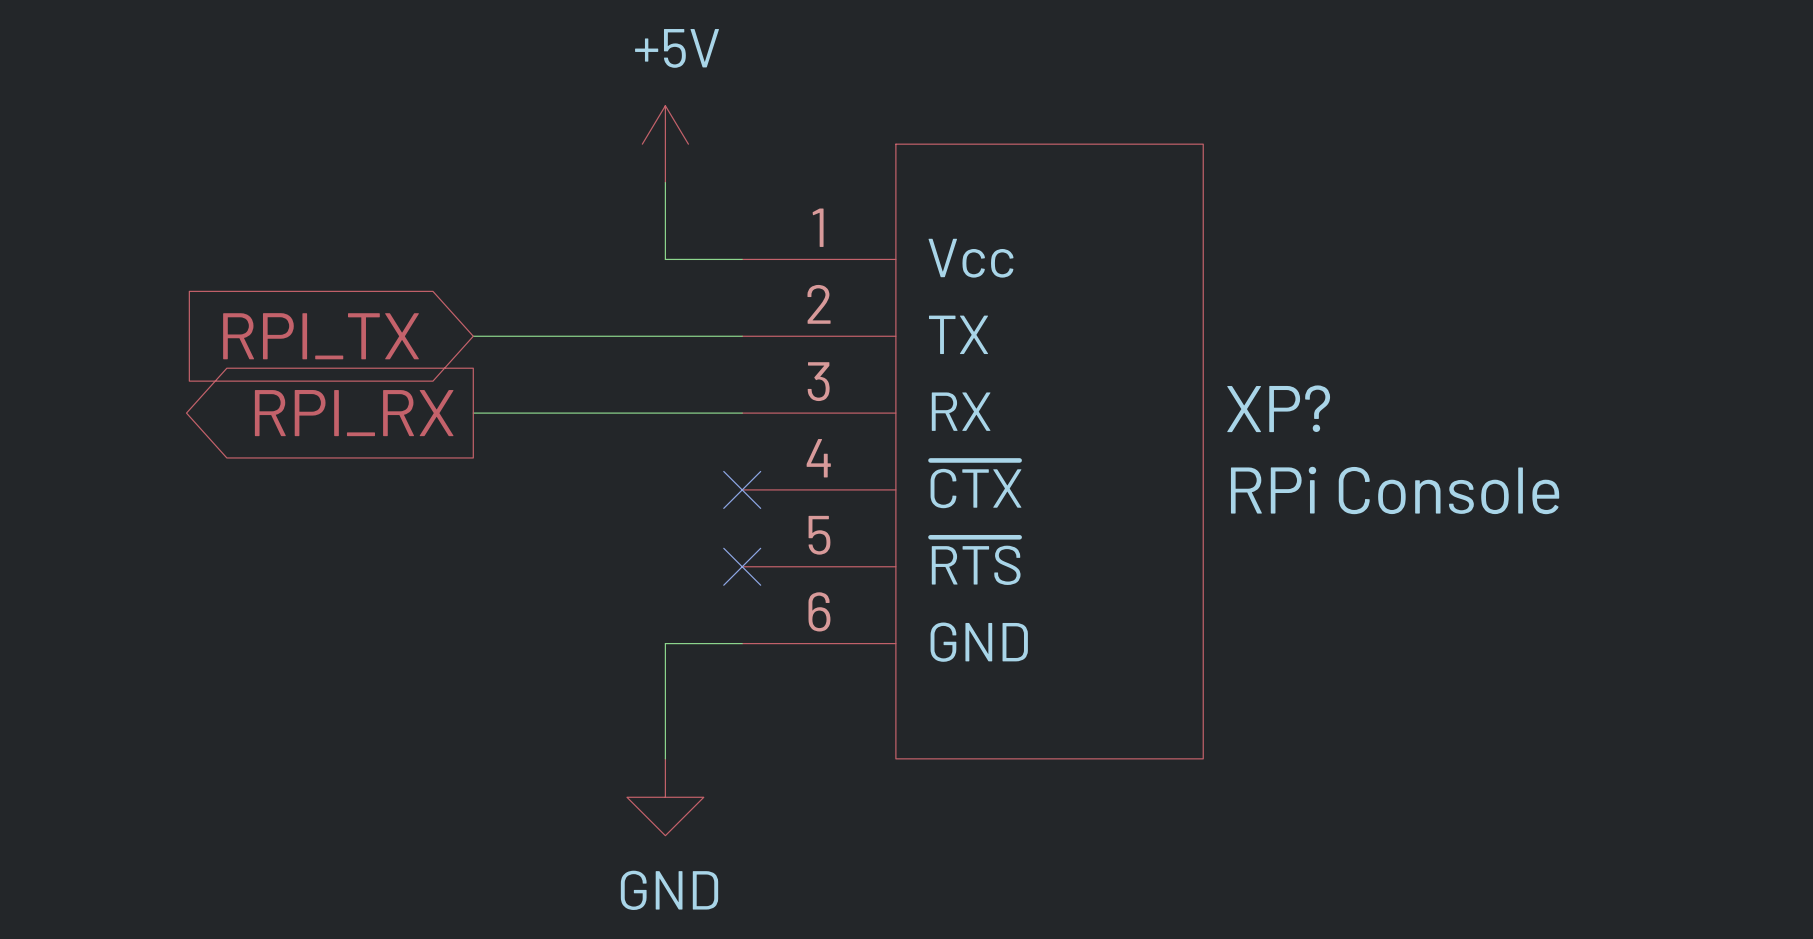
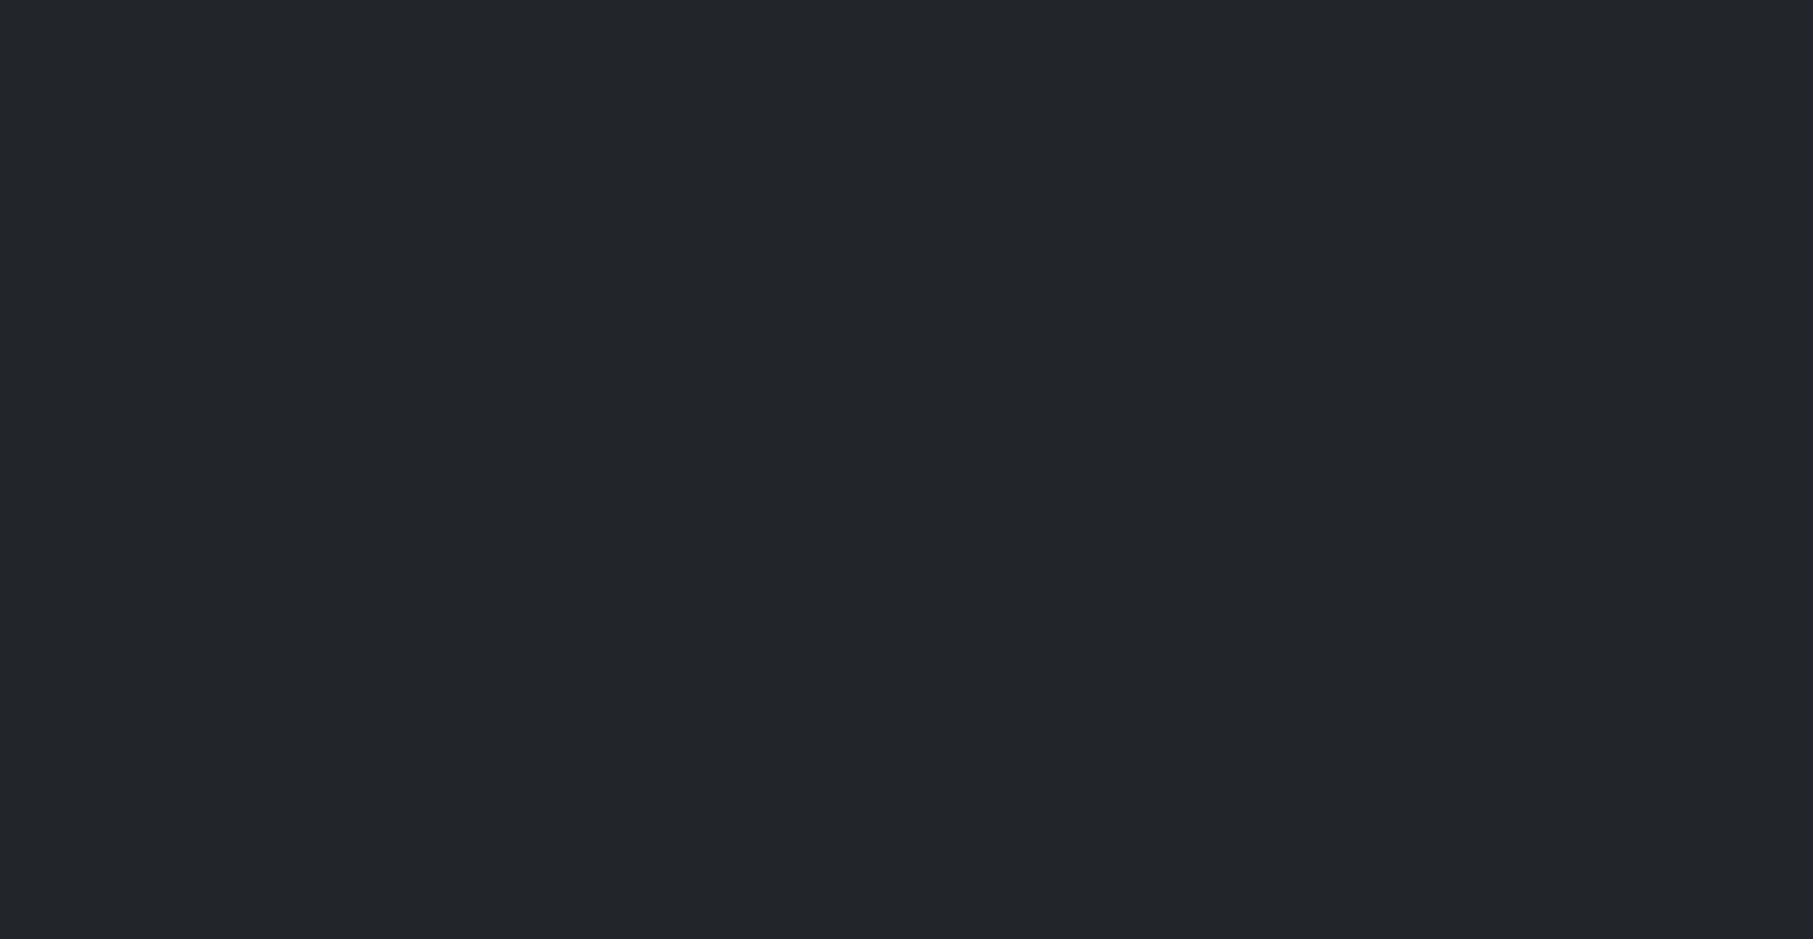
power symbol: +5V (665, 144) -> none
wire: (665, 182) (665, 259) (742, 259) -> none
global label: RPI_TX (321, 336) -> none
wire: (473, 336) (742, 336) -> none
global label: RPI_RX (354, 413) -> none
wire: (473, 413) (742, 413) -> none
XP?: RPi Console (972, 451) -> none
no-connect mark: (742, 489) -> none
no-connect mark: (742, 566) -> none
wire: (742, 643) (665, 643) (665, 758) -> none
power symbol: GND (665, 797) -> none

